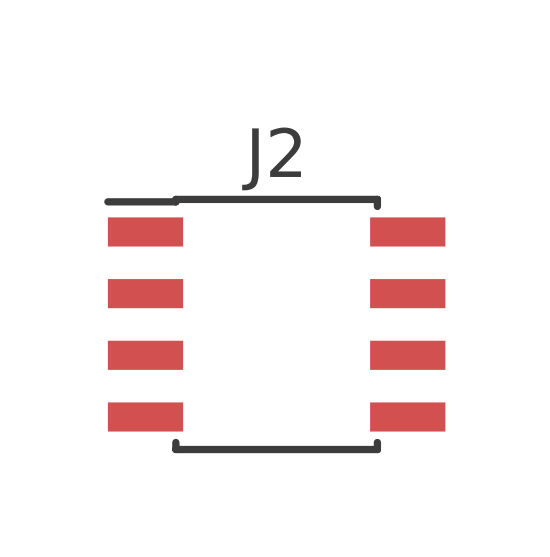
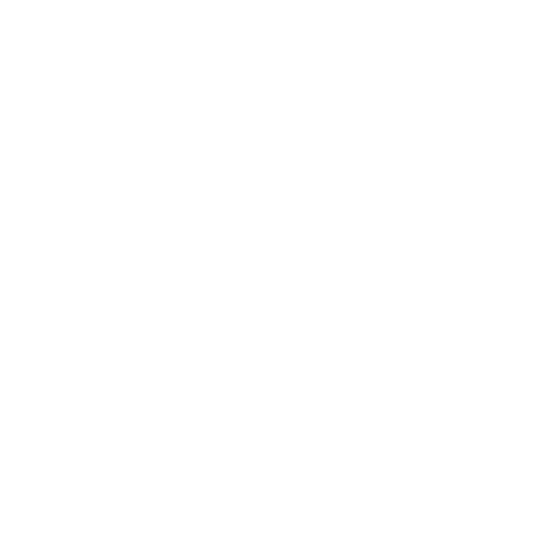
J2: (274, 324) -> none

